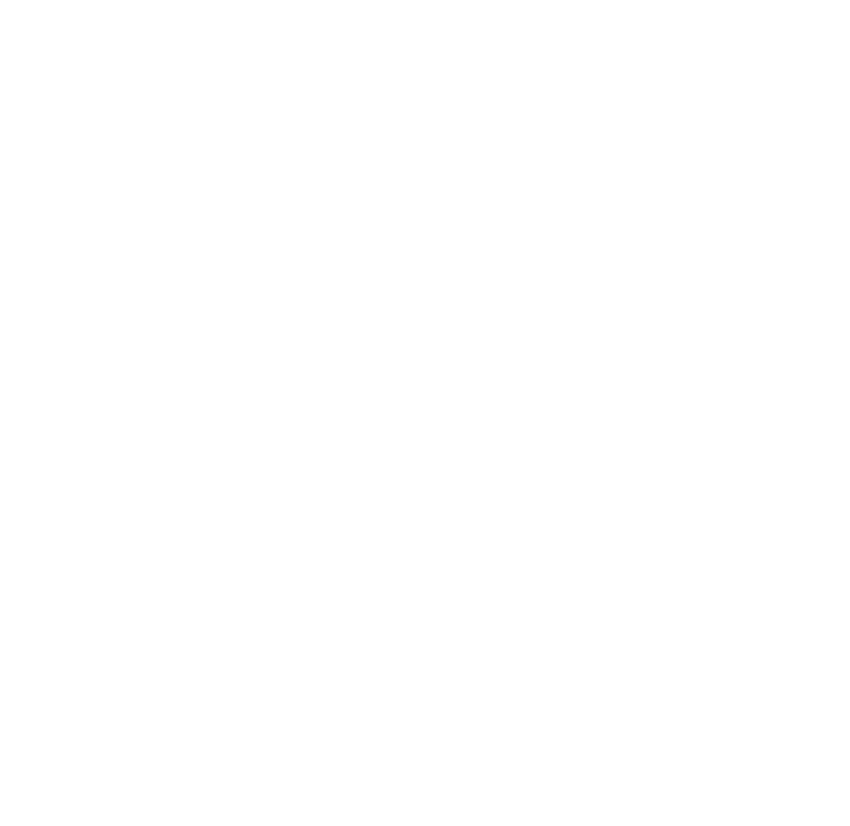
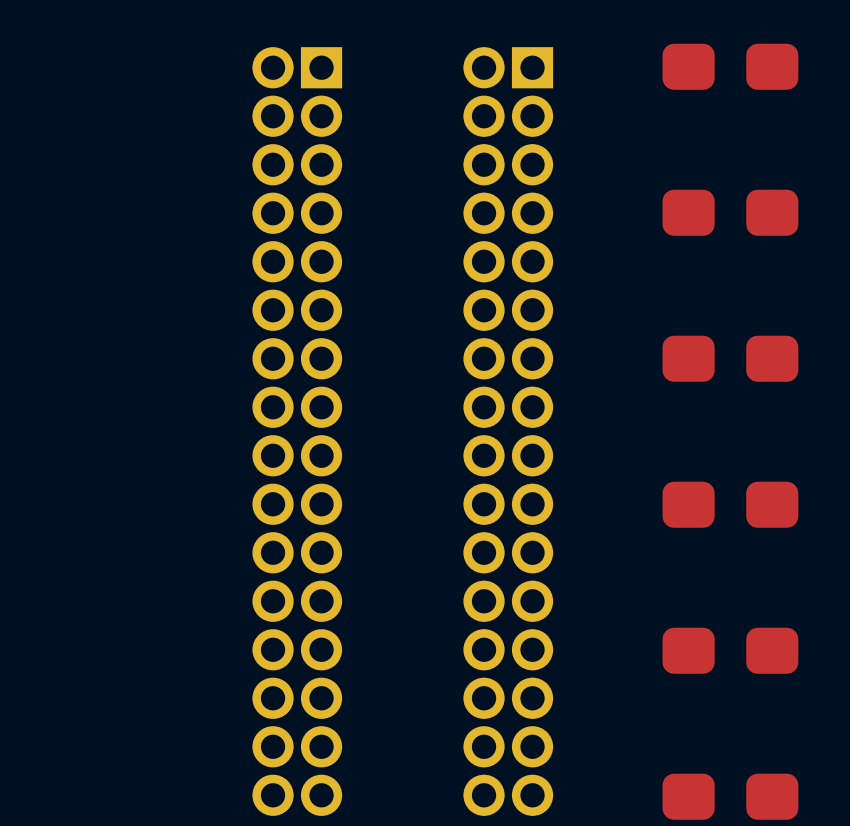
part: none -> (730, 66)
part: none -> (730, 212)
part: none -> (730, 358)
part: none -> (297, 431)
part: none -> (508, 431)
part: none -> (730, 504)
part: none -> (730, 650)
part: none -> (730, 796)

